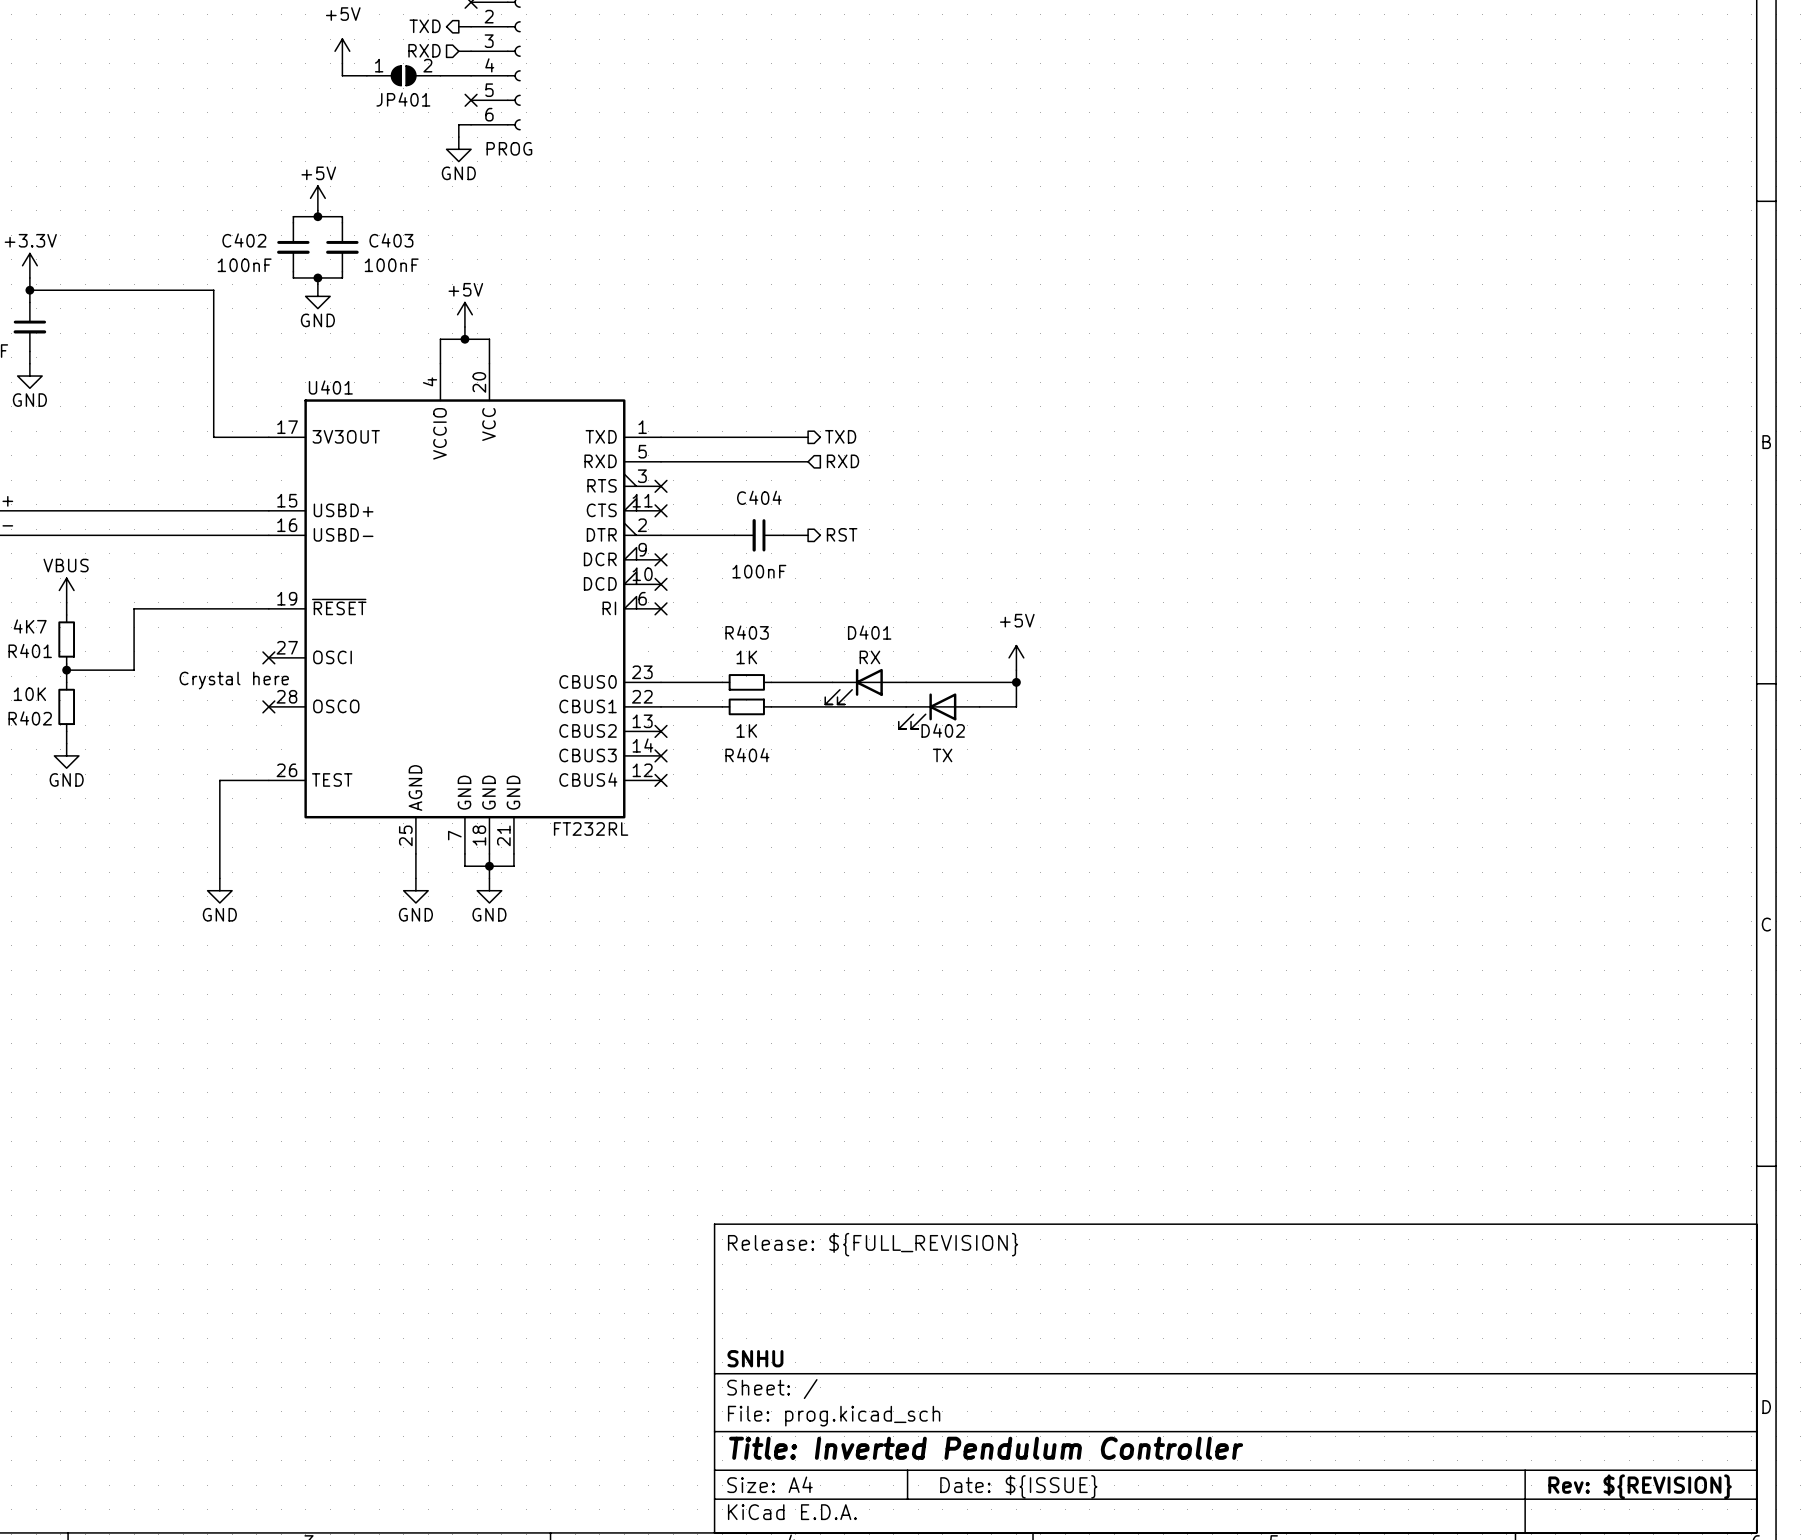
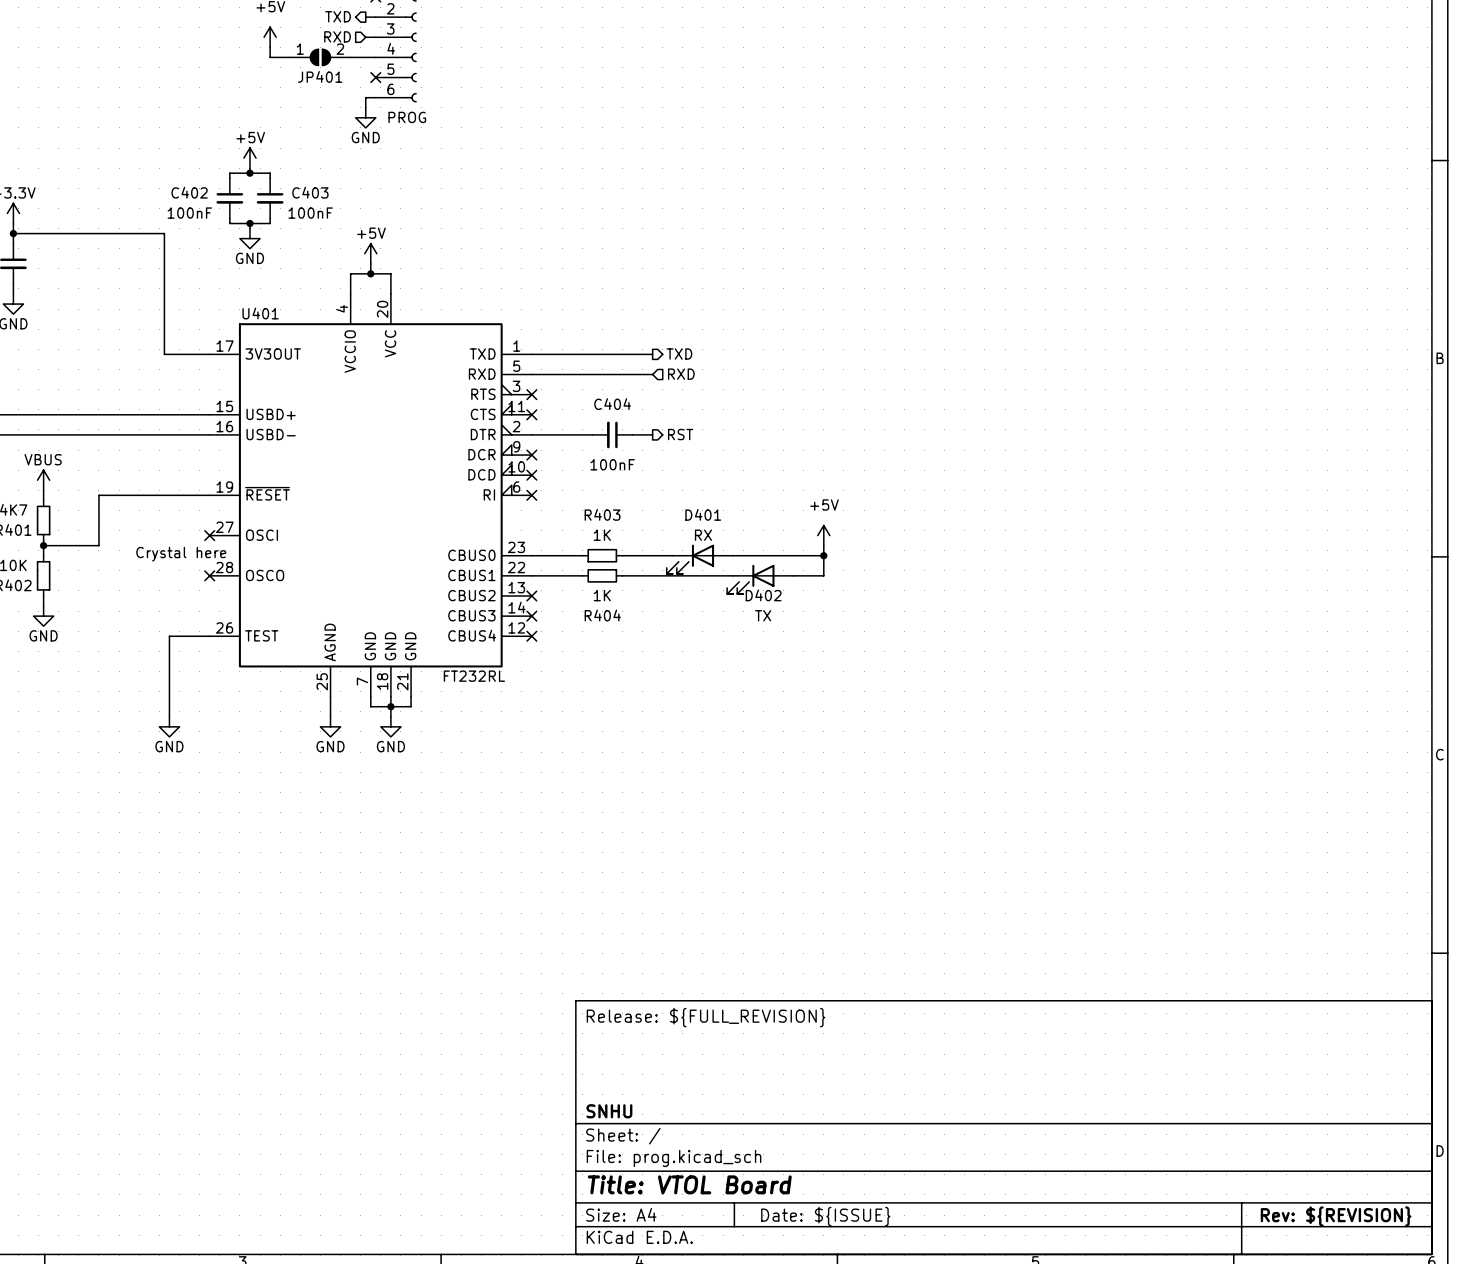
title block: Title: Inverted Pendulum Controller (986, 1448) -> Title: VTOL Board (689, 1184)

